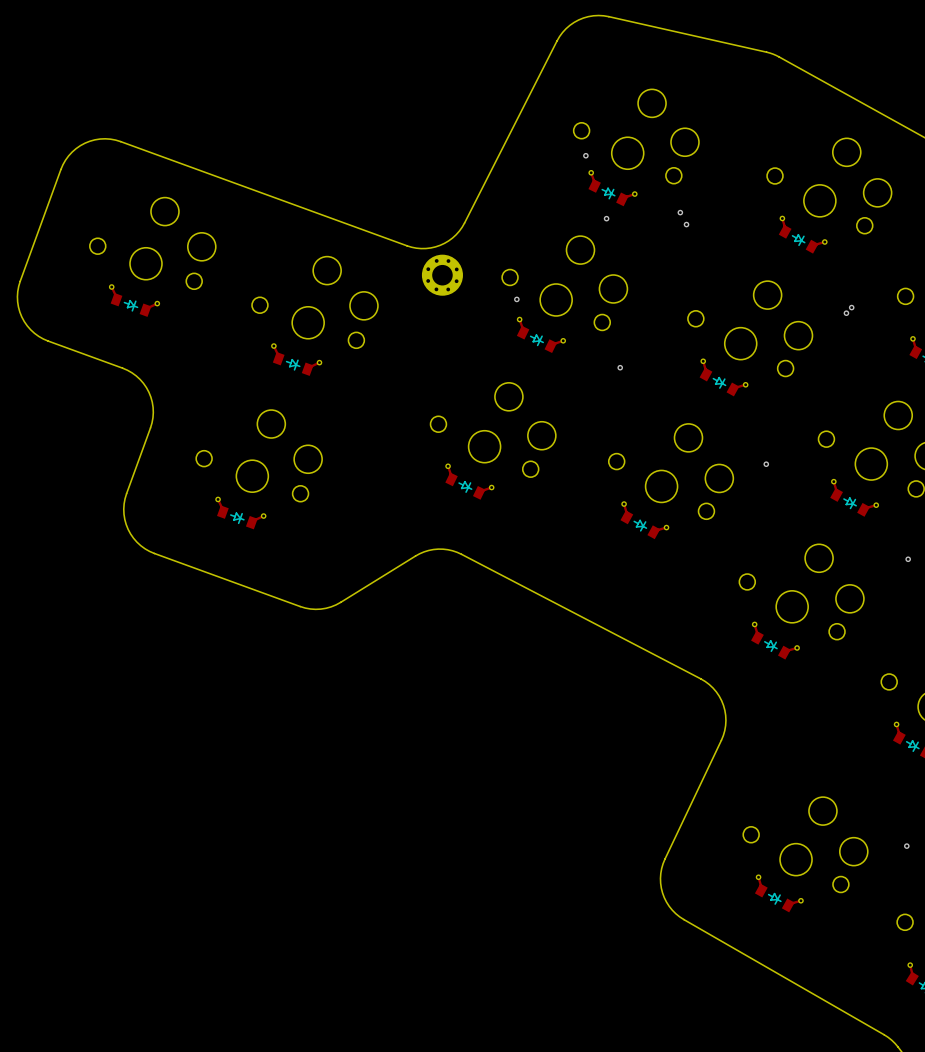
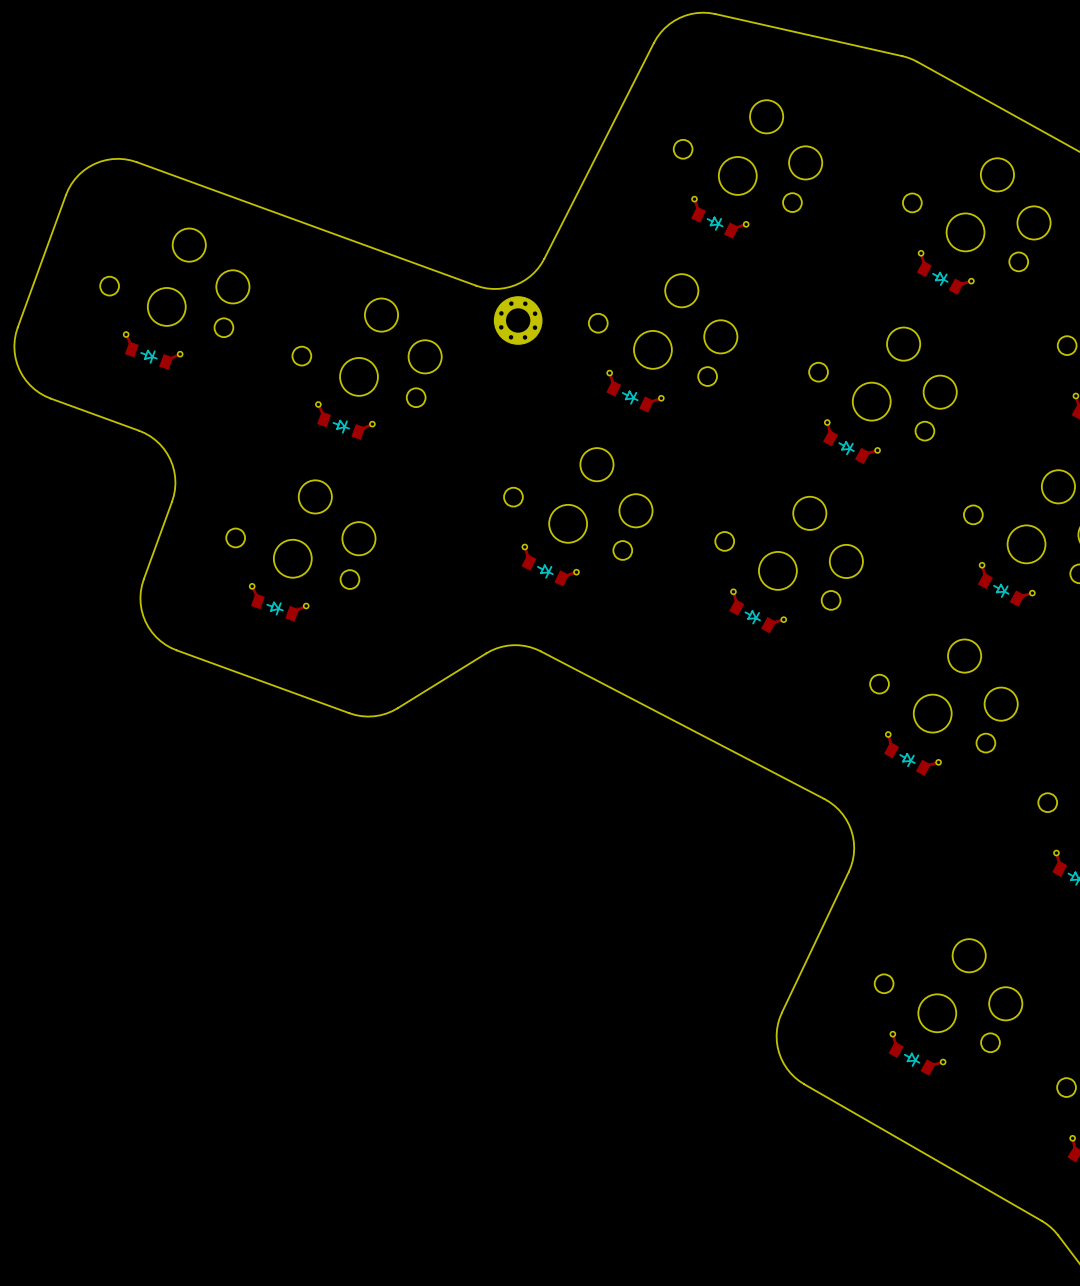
via: (585, 155) -> none
via: (680, 212) -> none
via: (606, 218) -> none
via: (686, 224) -> none
via: (516, 299) -> none
via: (851, 307) -> none
via: (846, 313) -> none
via: (620, 367) -> none
via: (766, 464) -> none
via: (908, 559) -> none
via: (906, 846) -> none

